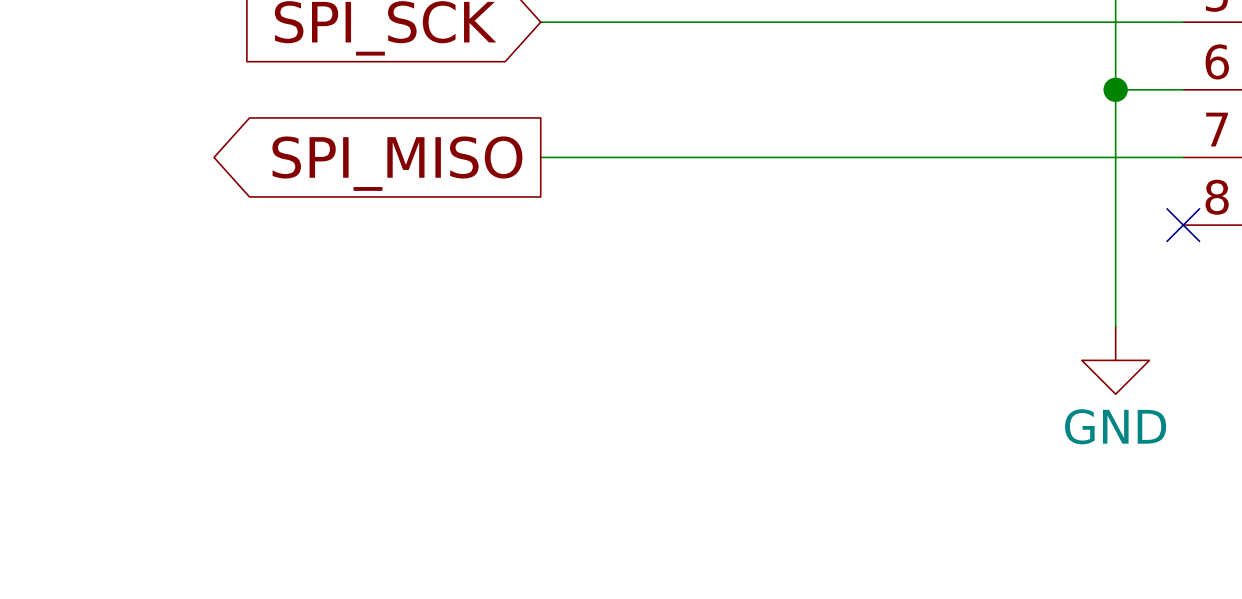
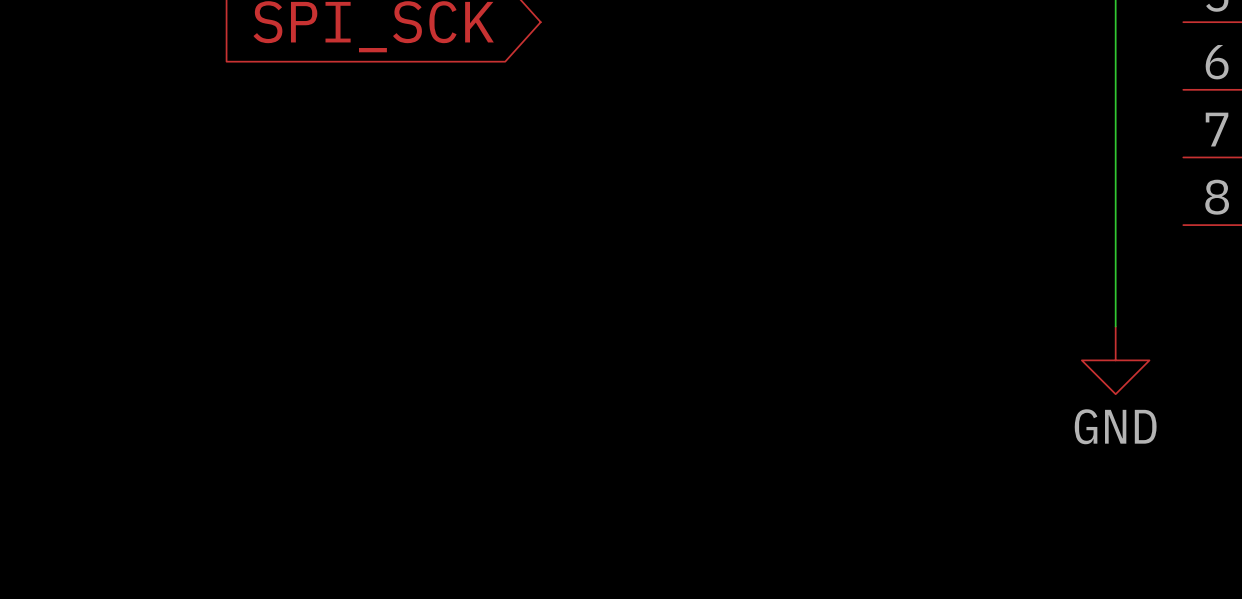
wire: (540, 22) (1183, 22) -> none
wire: (1115, 89) (1183, 89) -> none
junction: (1115, 89) -> none
wire: (540, 157) (1183, 157) -> none
global label: SPI_MISO (397, 163) -> none
no-connect mark: (1183, 225) -> none

